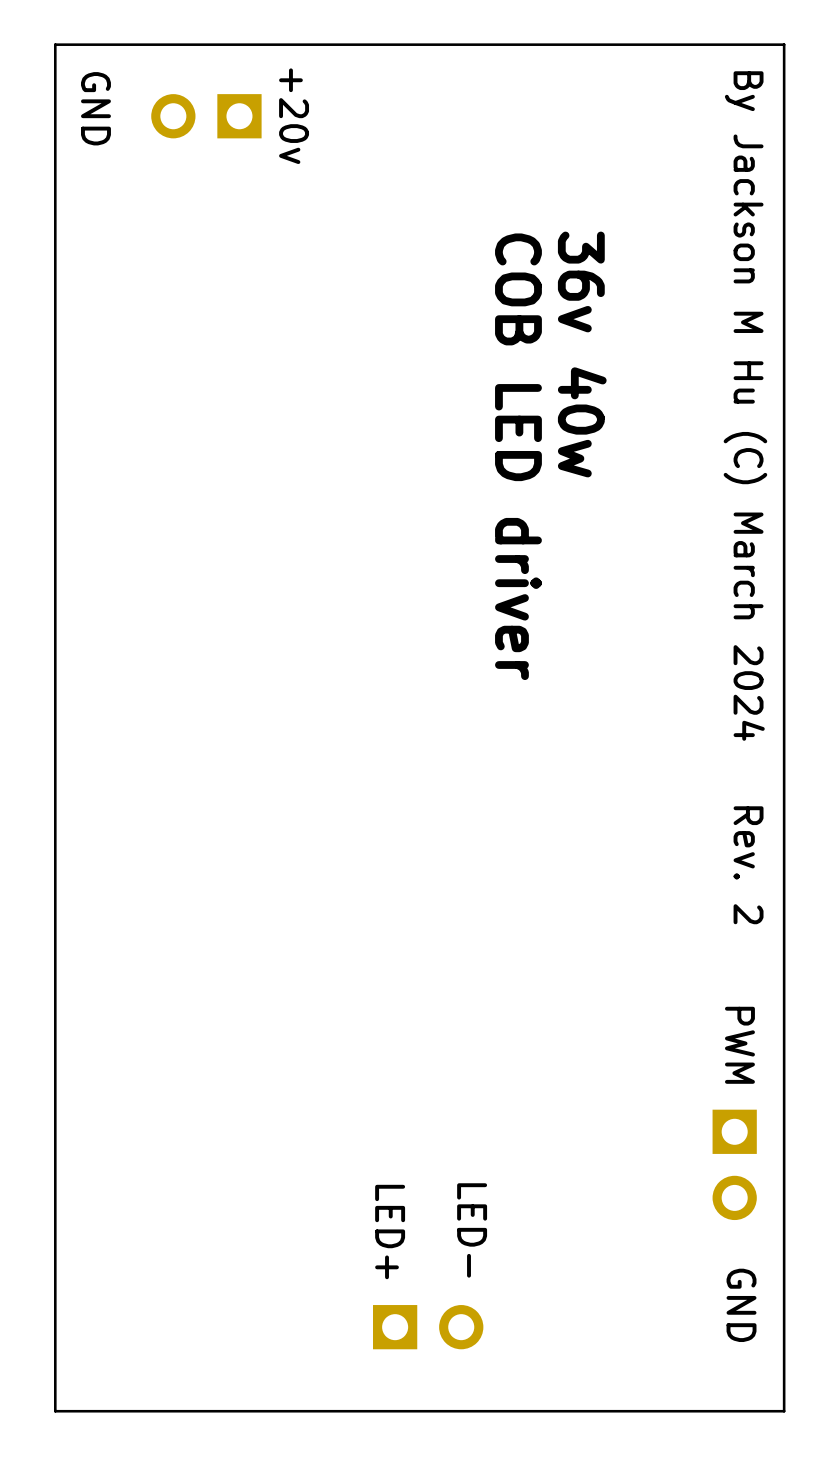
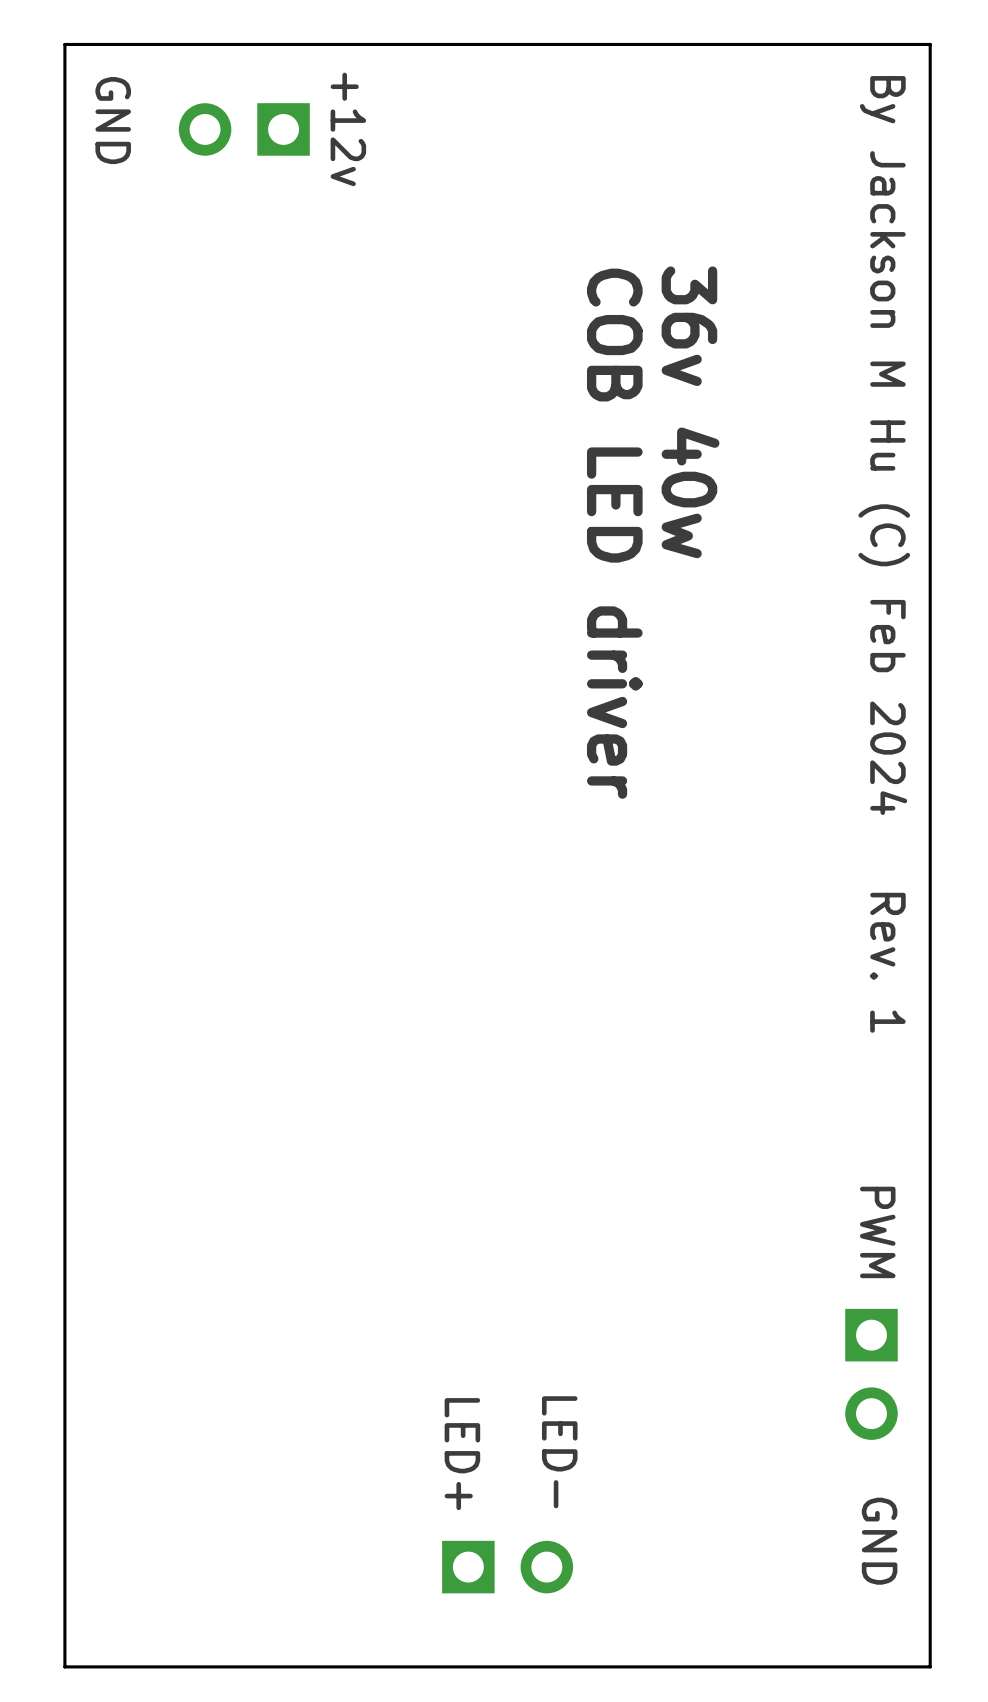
text: +20v (294, 116) -> +12v (348, 129)
text: By Jackson M Hu (C) March 2024 Rev. 2 (745, 497) -> By Jackson M Hu (C) Feb 2024 Rev. 1 (884, 554)

